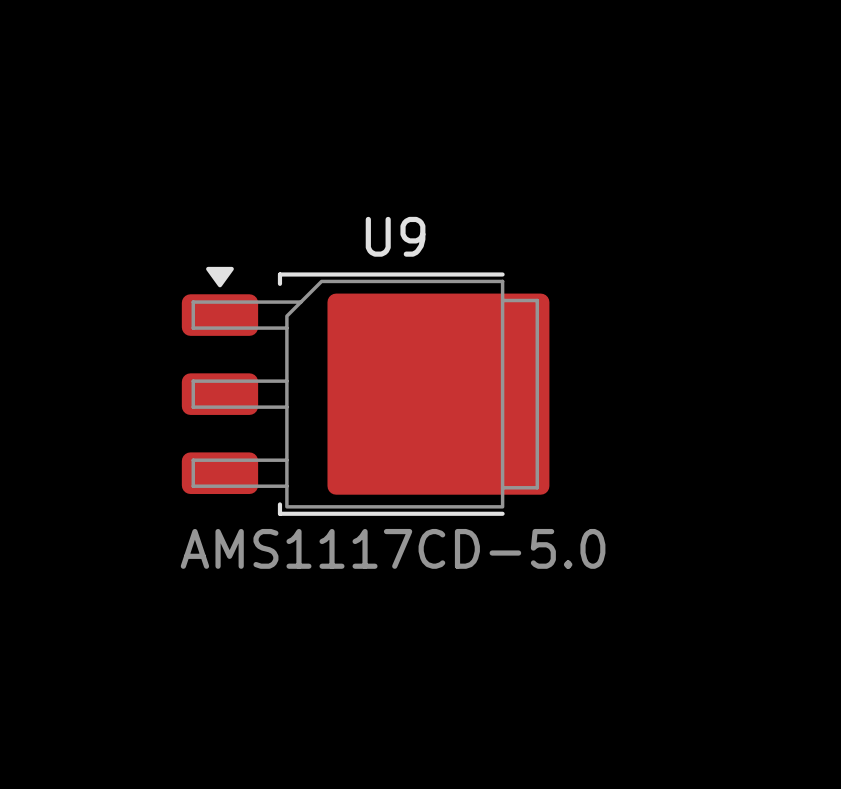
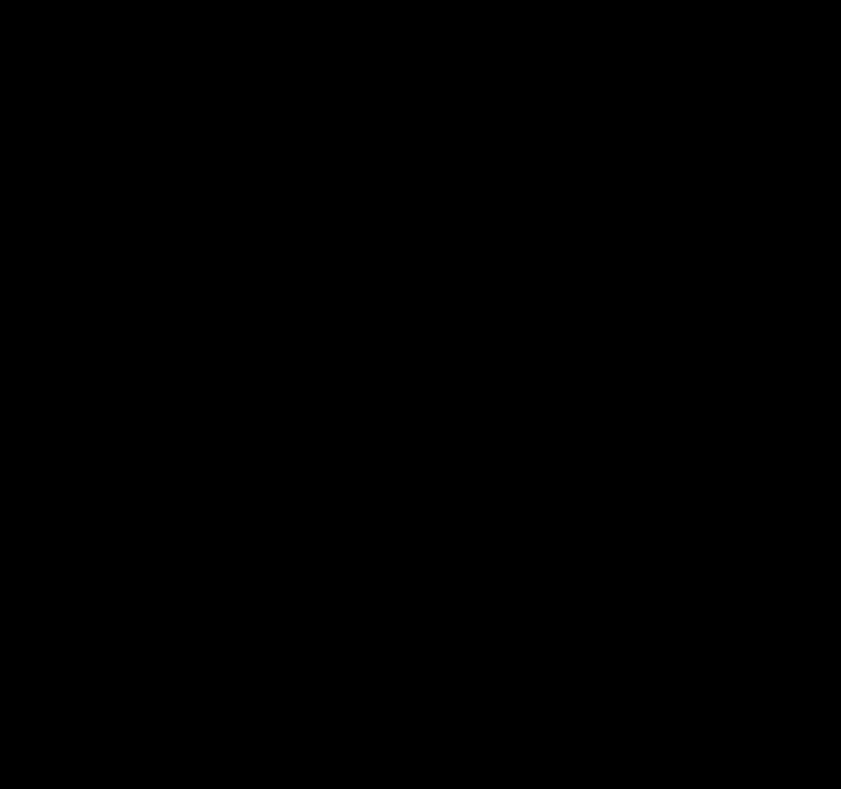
U9: AMS1117CD-5.0 (365, 391) -> none

